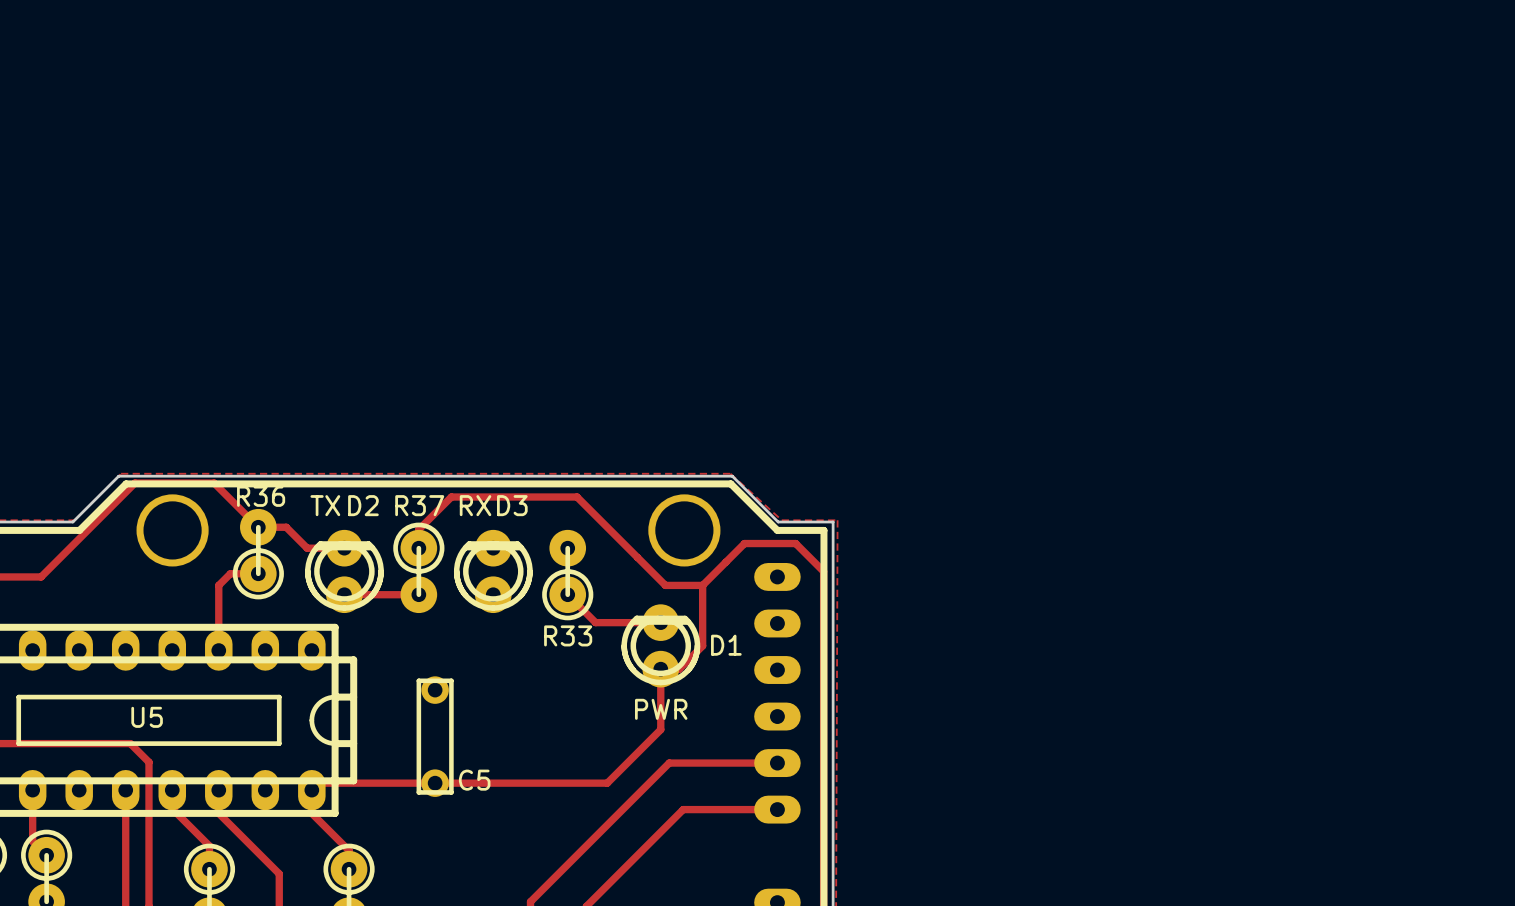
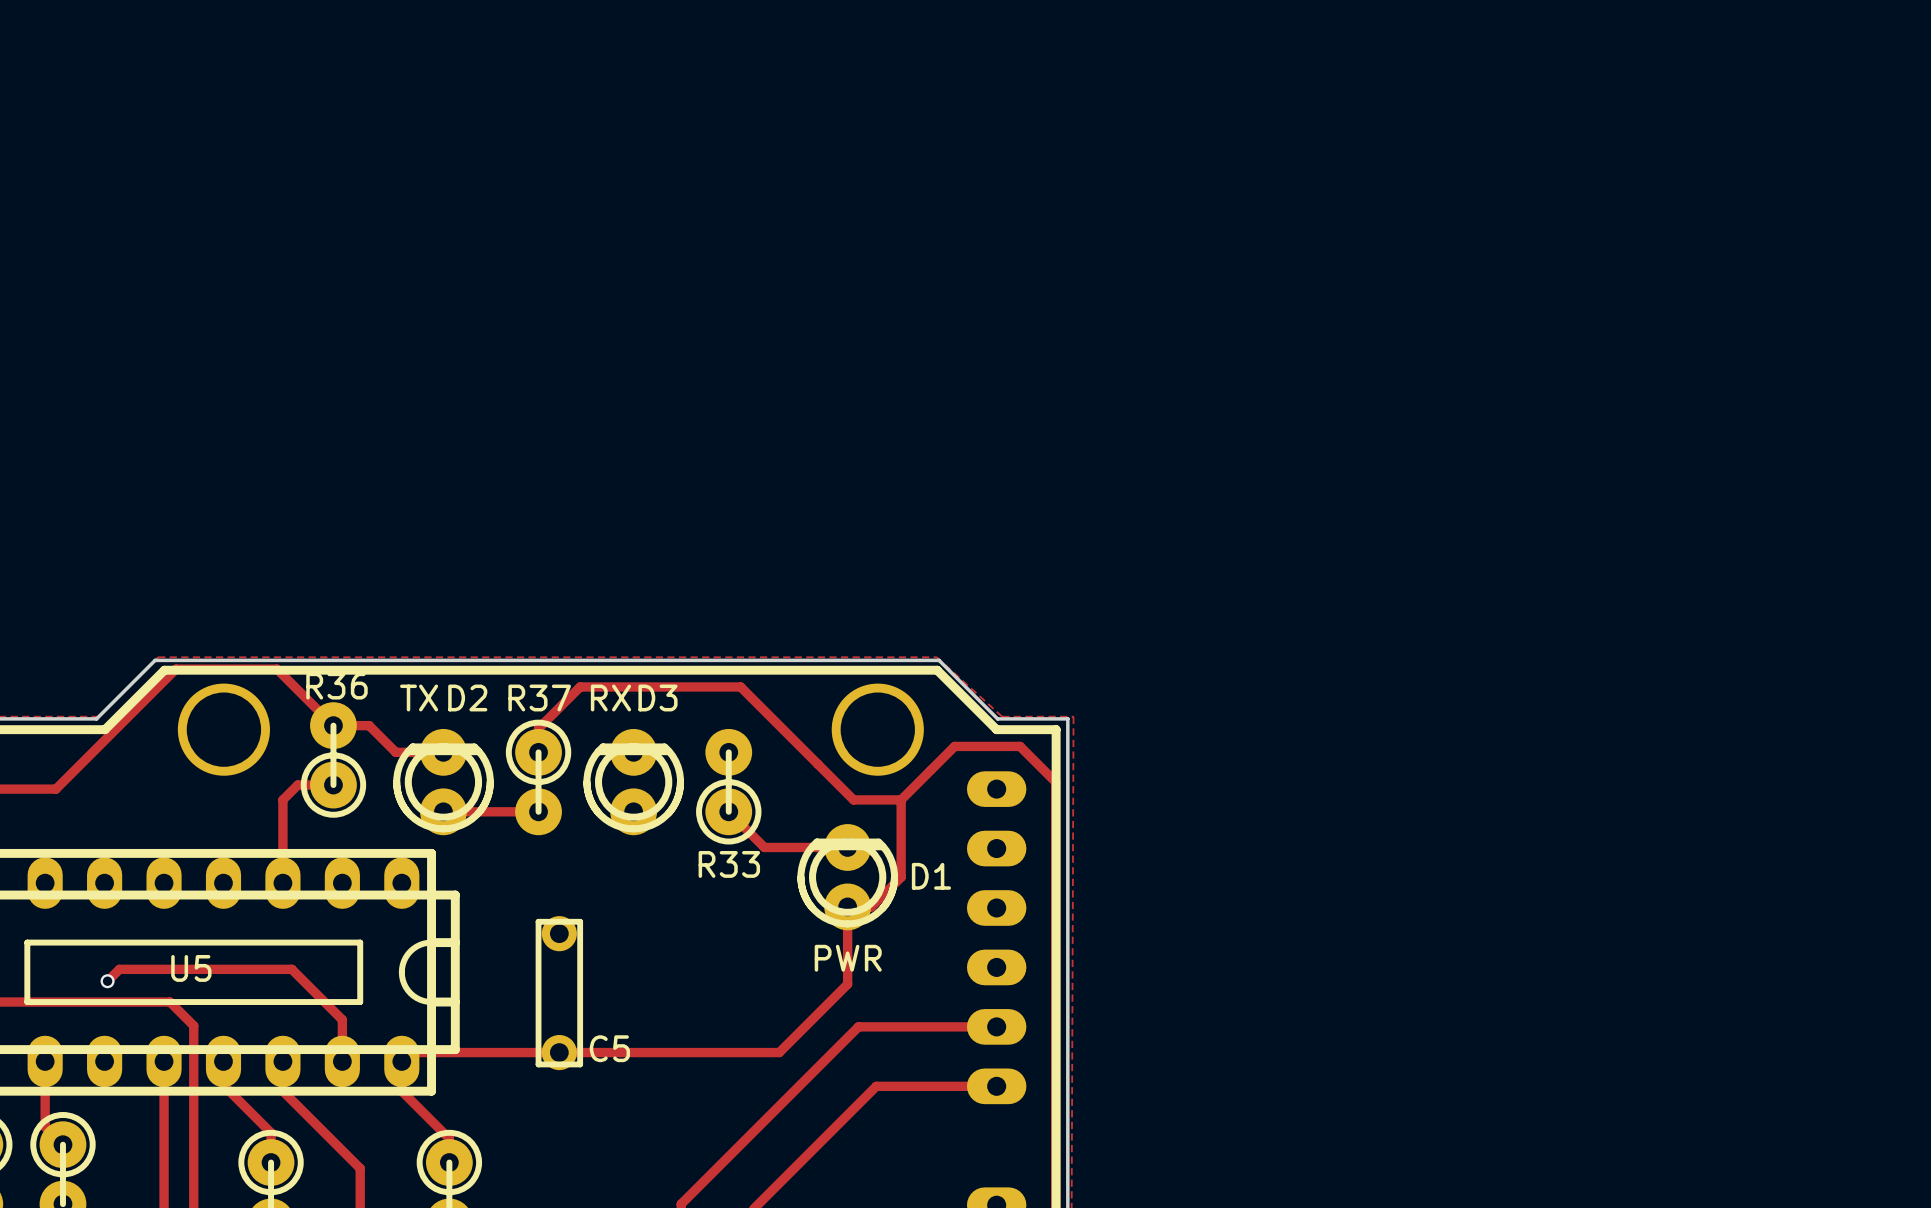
track: none -> (107, 981) (119, 969) (291, 969) (342, 1019) (342, 1061)
via: none -> (107, 981)

